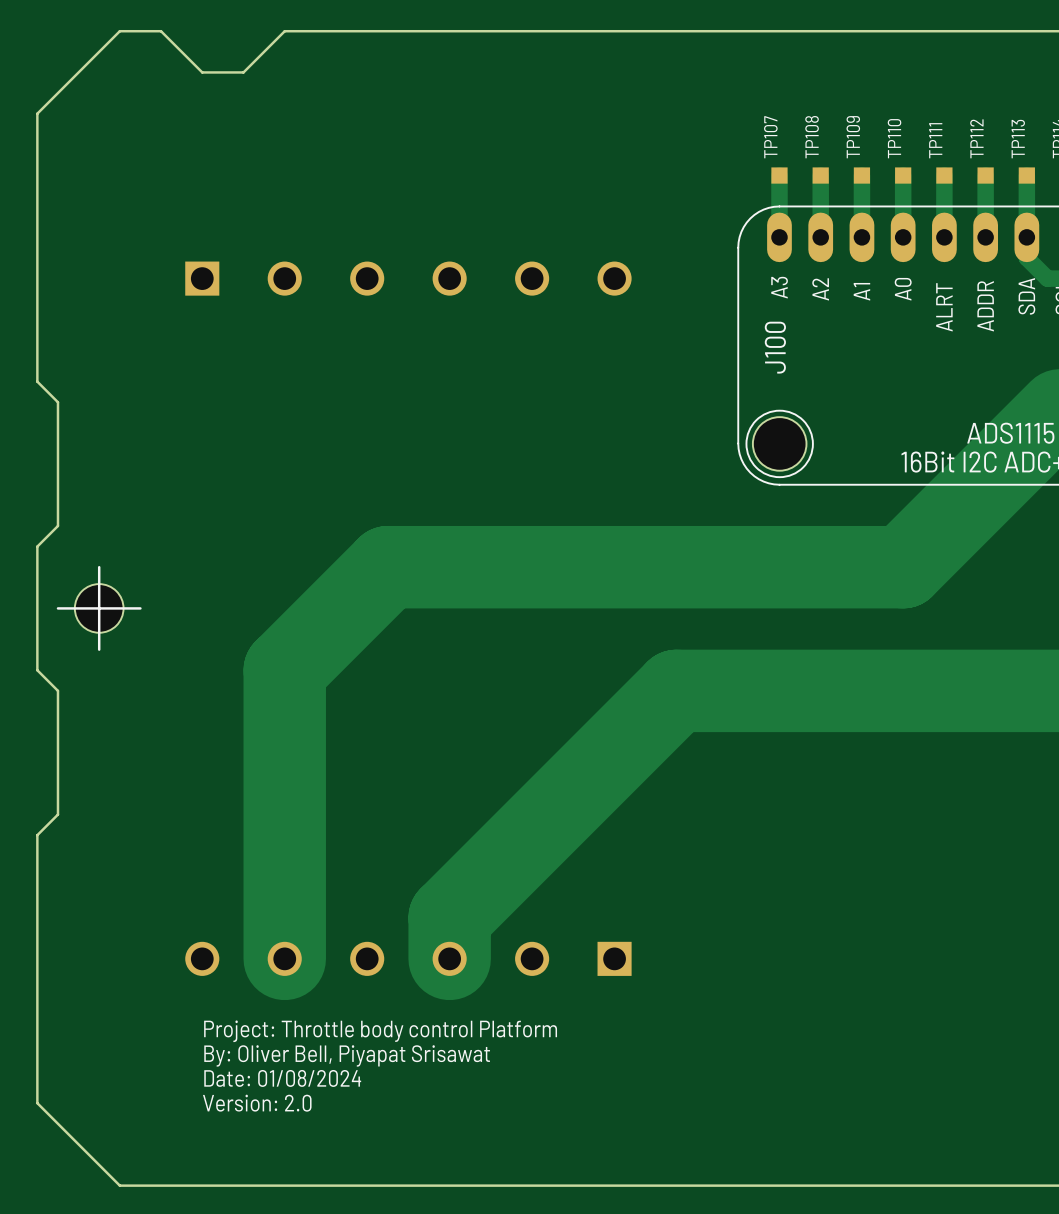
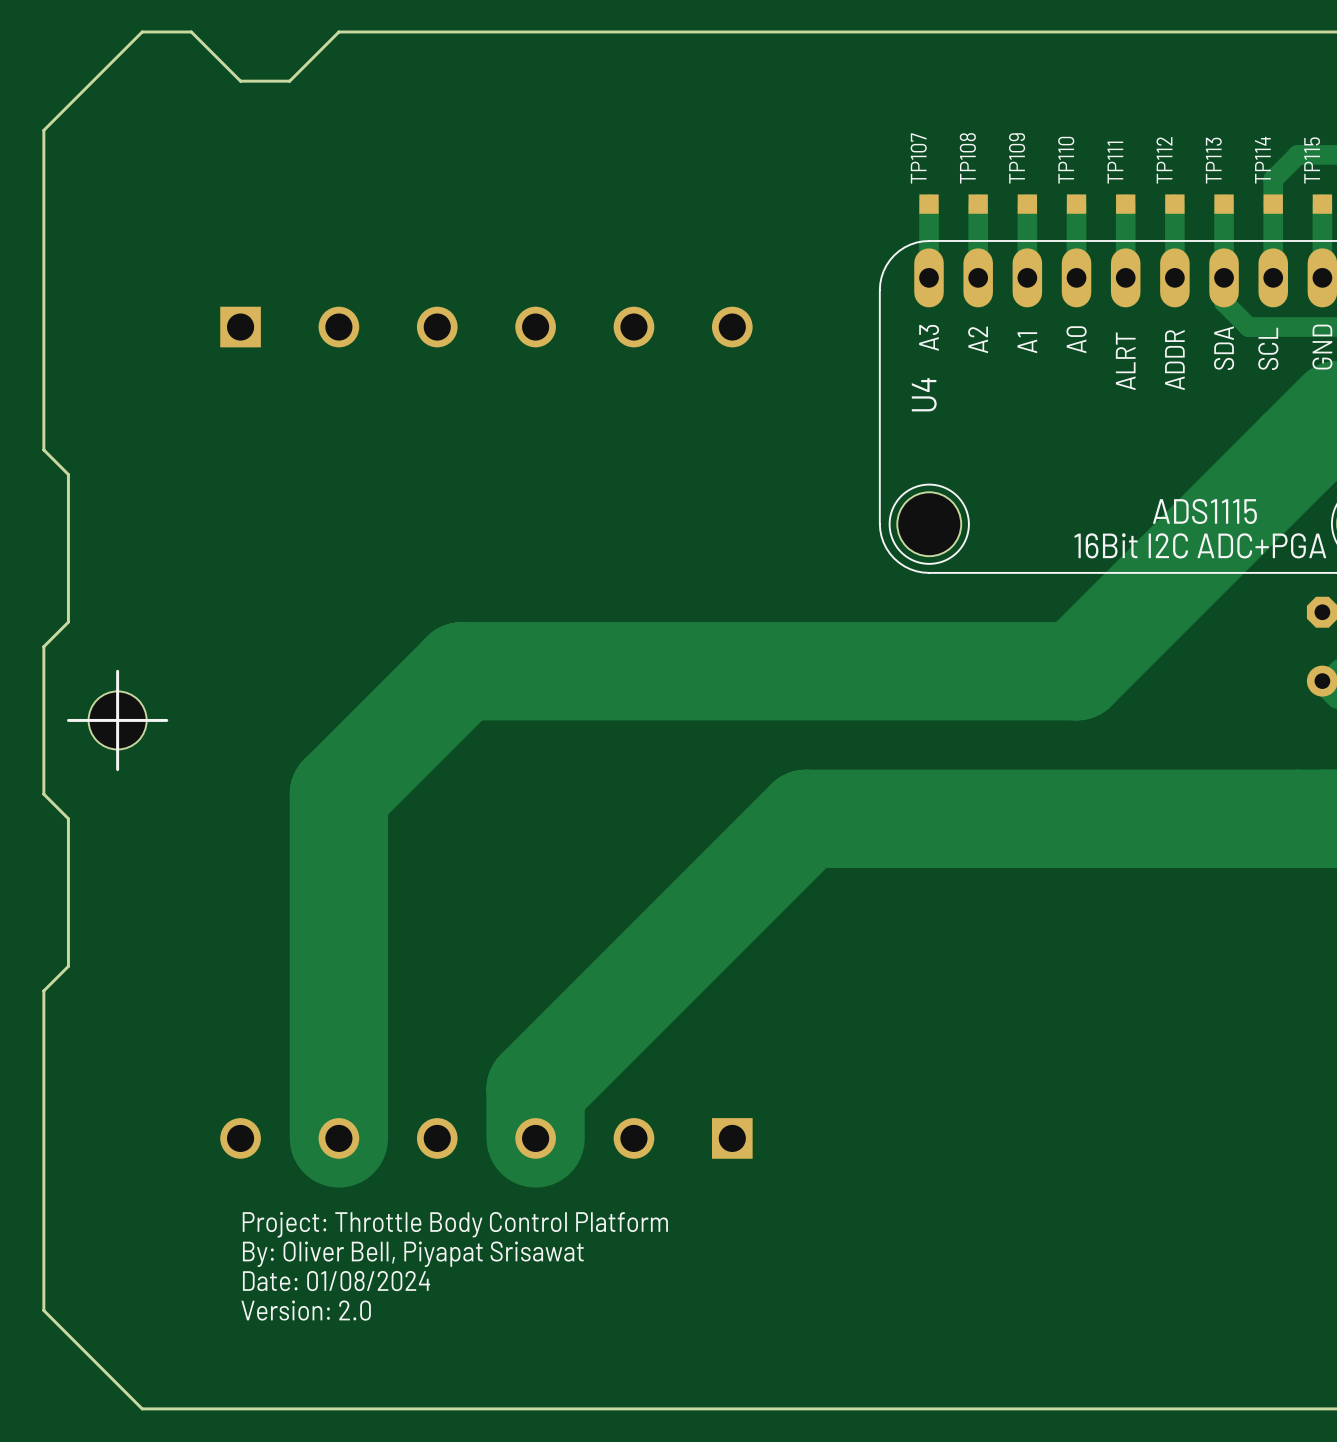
J100 name: J100 (775, 347) -> U4 (924, 394)
text: Project: Throttle body control Platform (380, 1031) -> Project: Throttle Body Control Platform (455, 1224)

